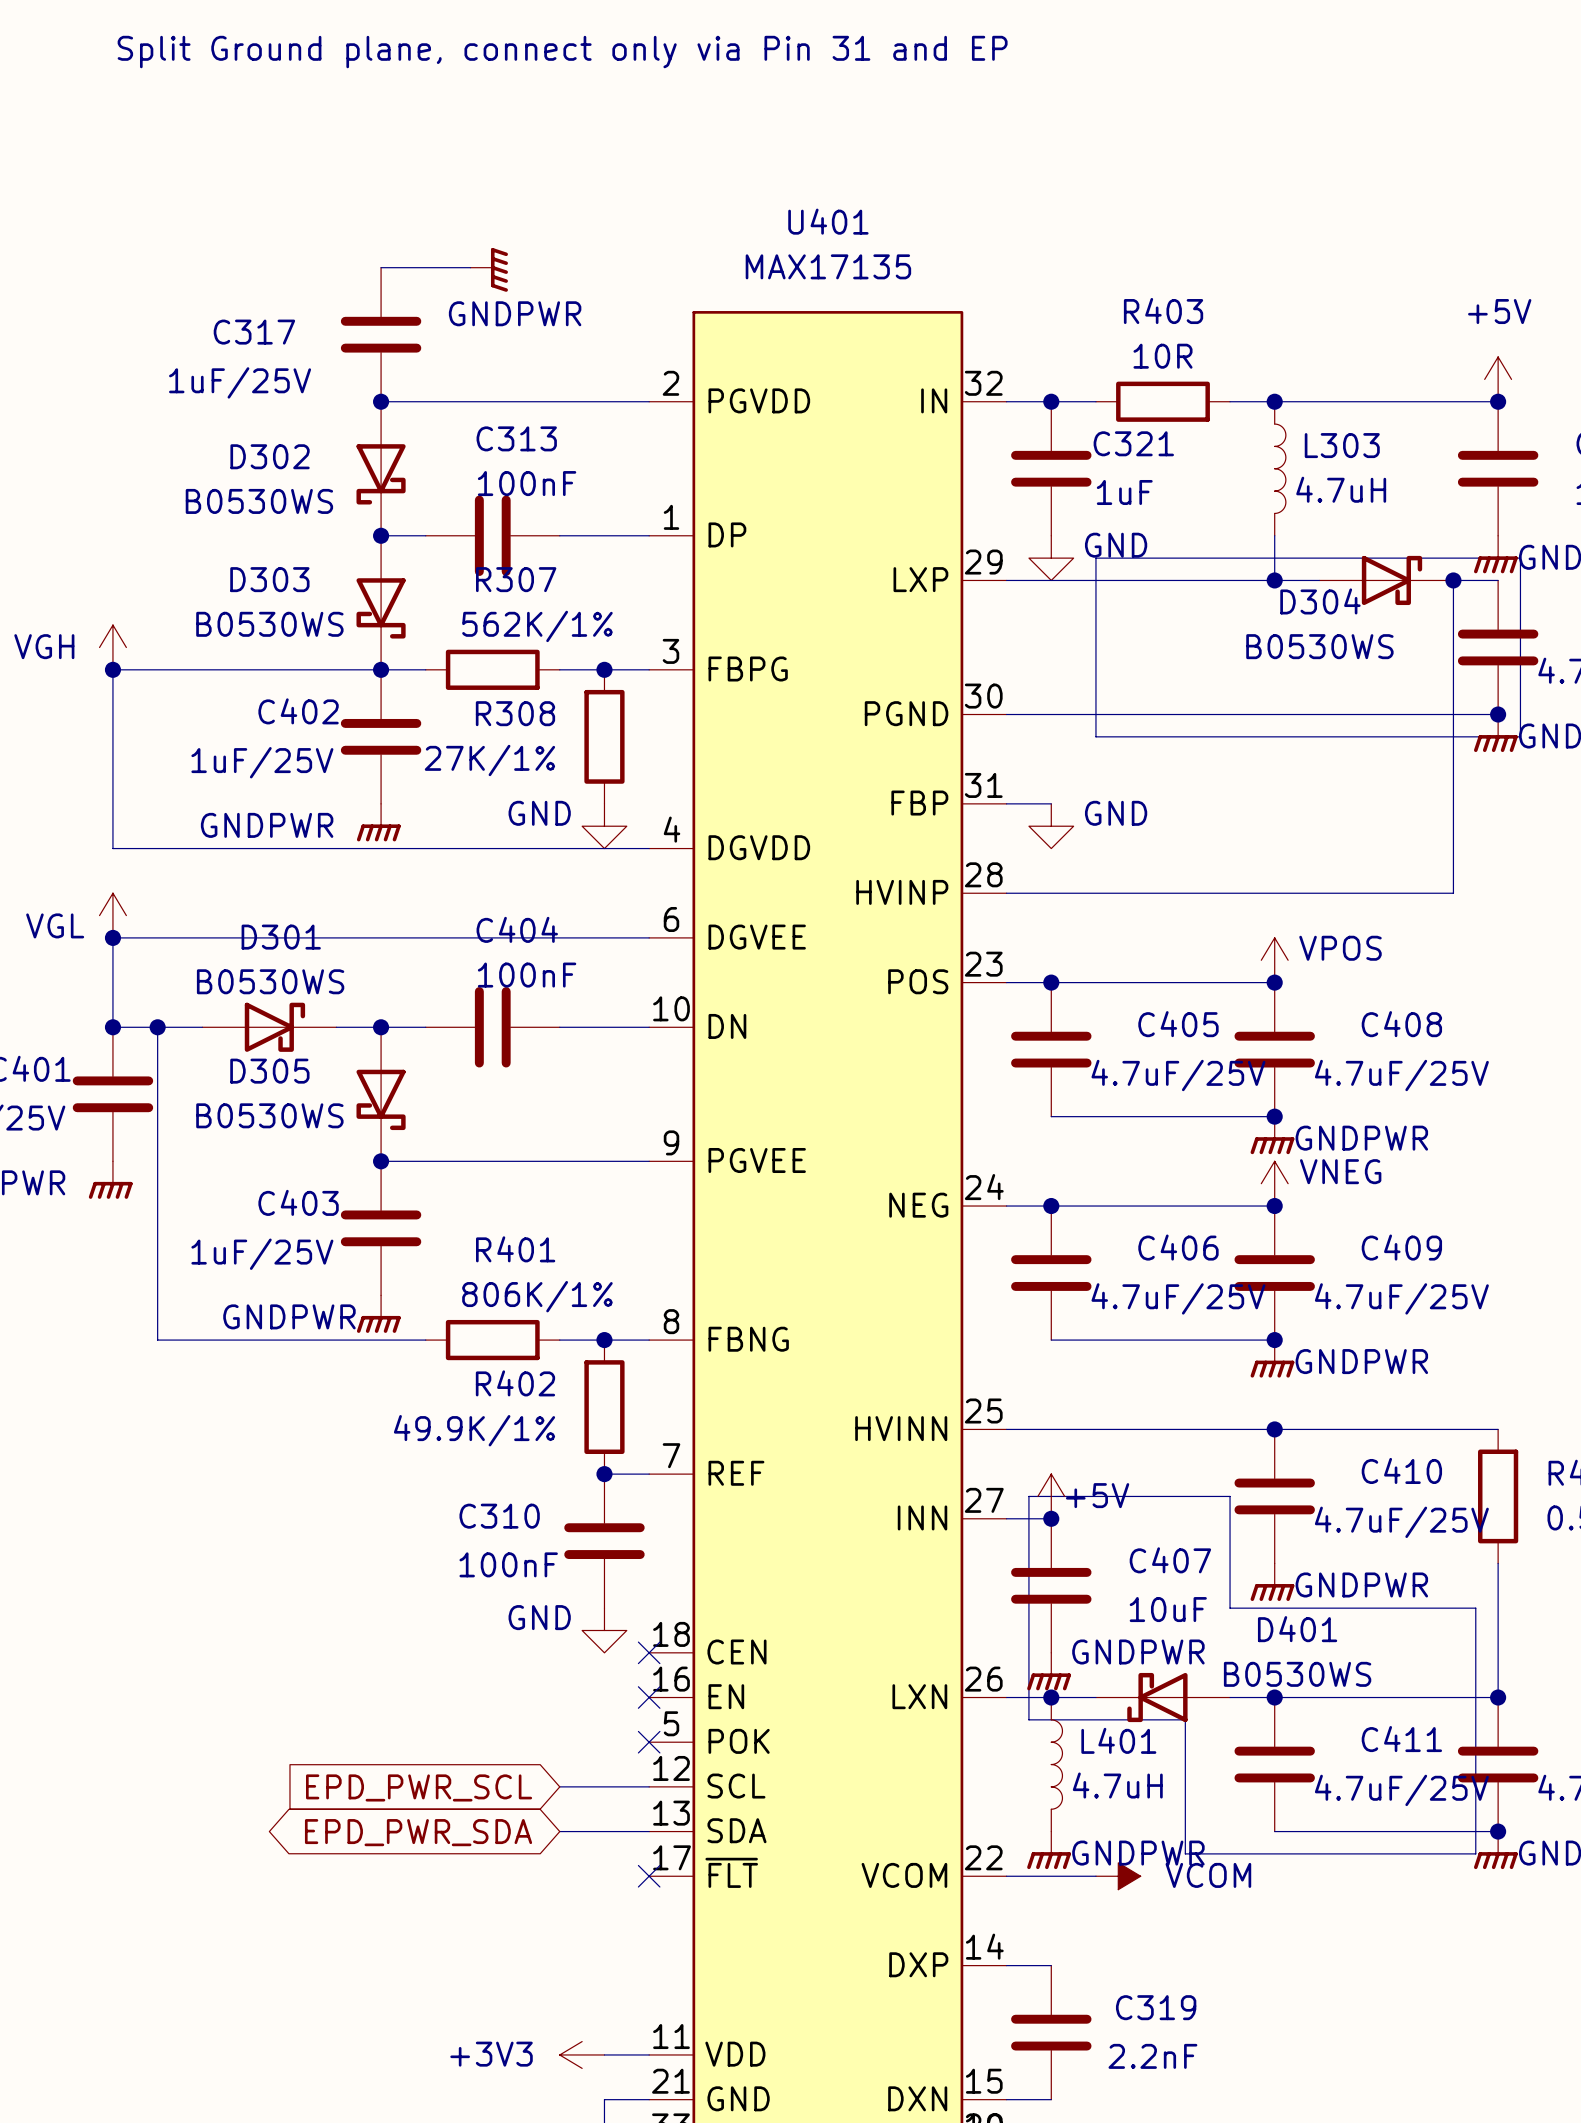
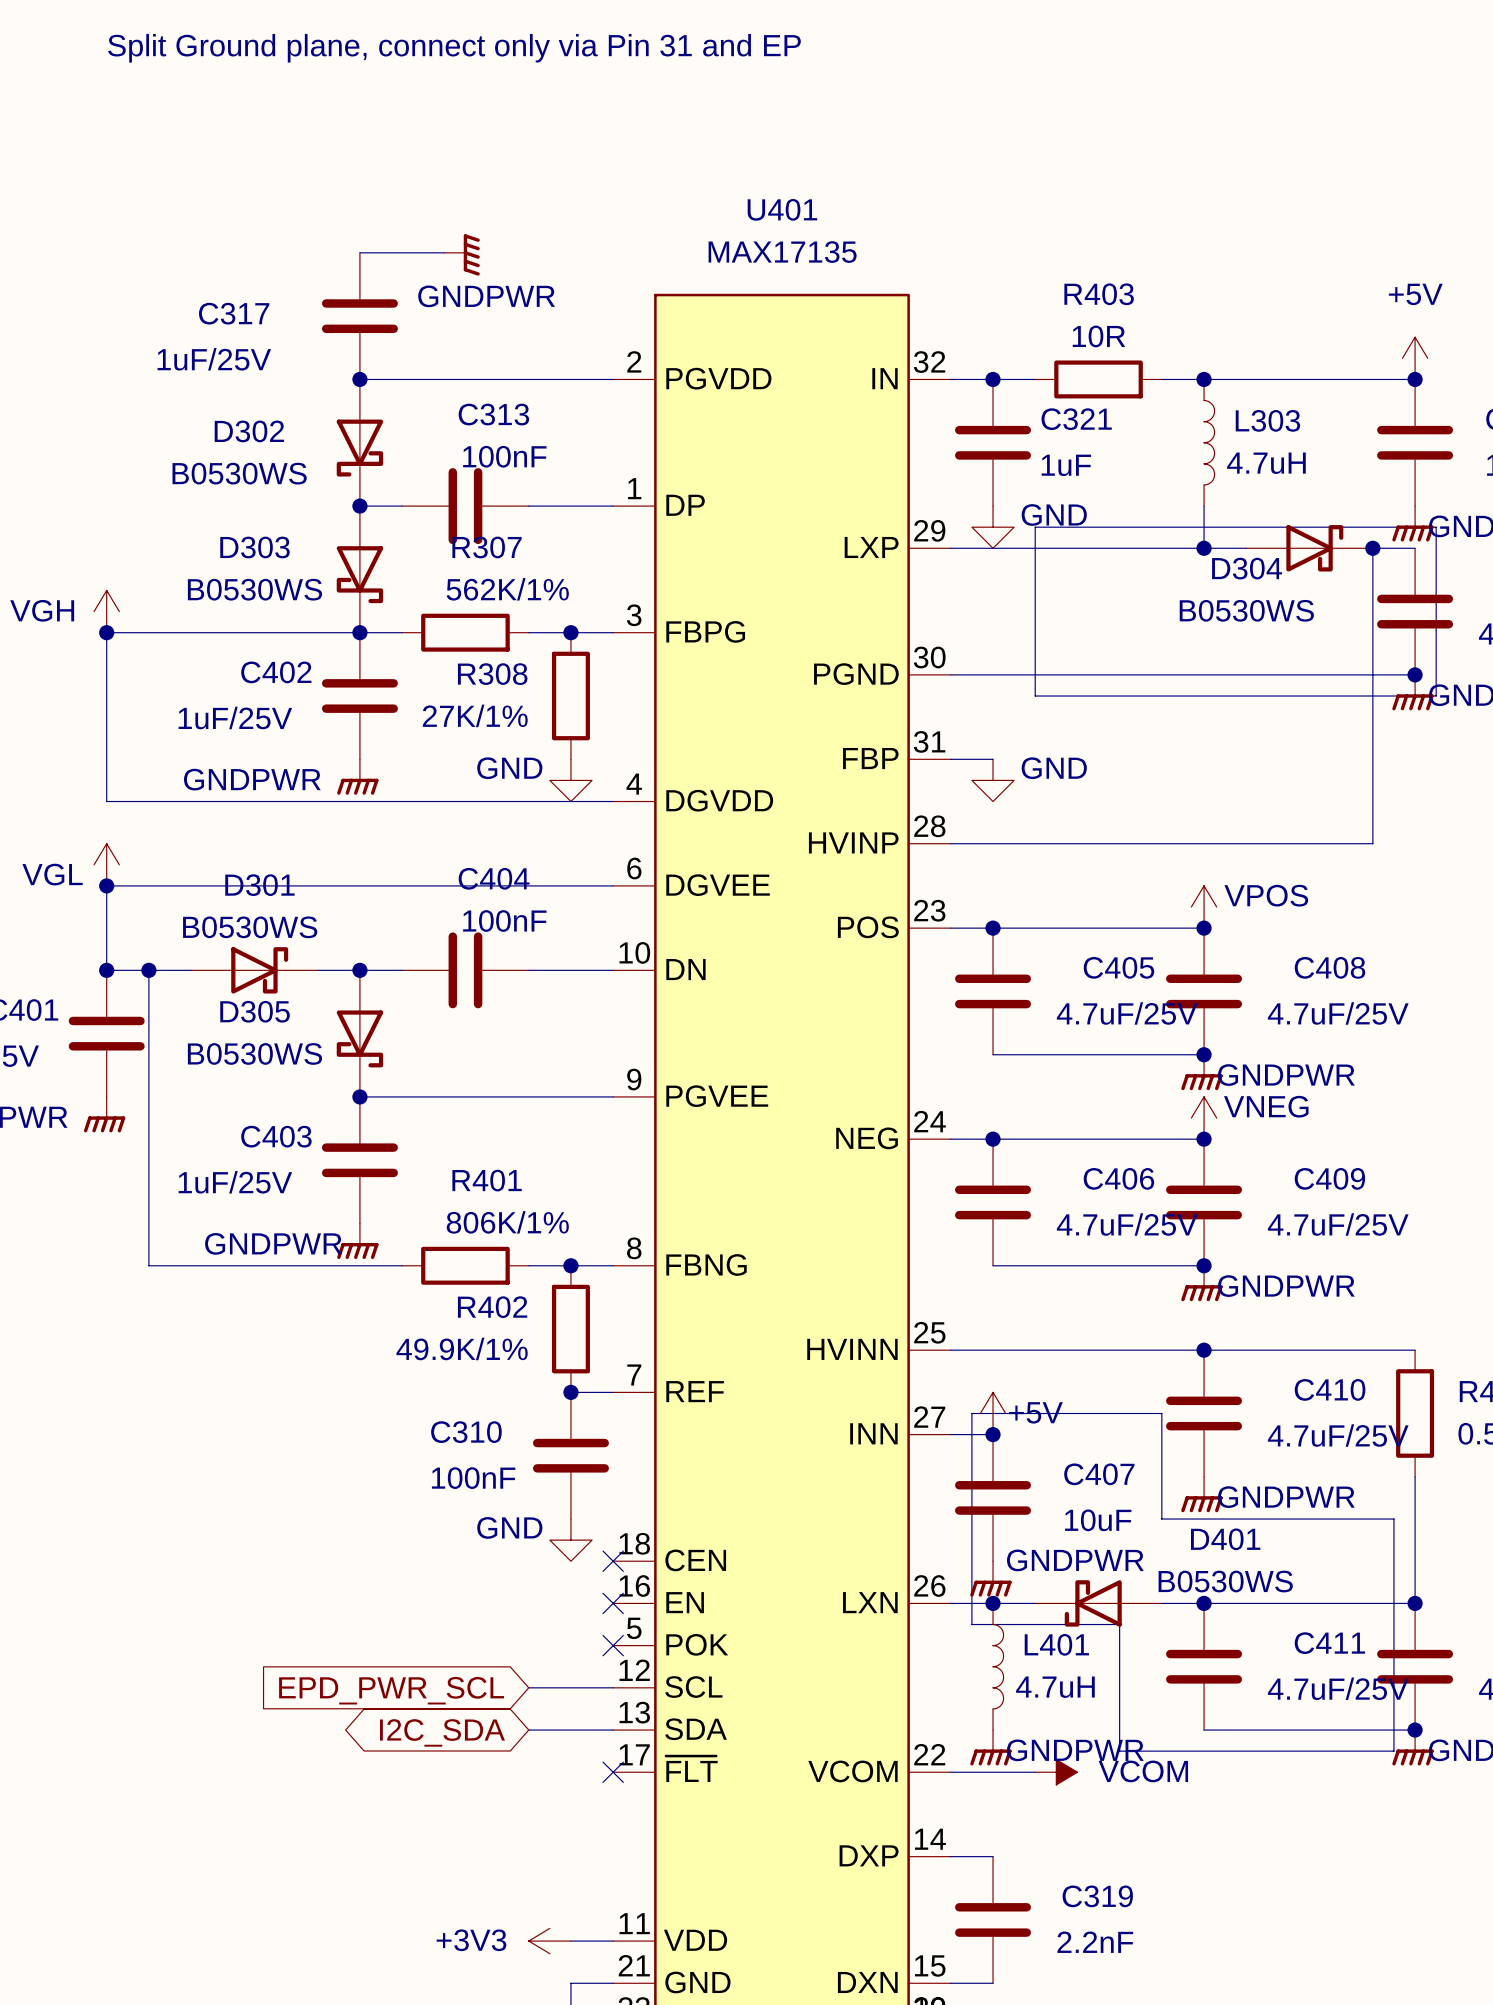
global label: EPD_PWR_SDA (418, 1832) -> I2C_SDA (442, 1732)

